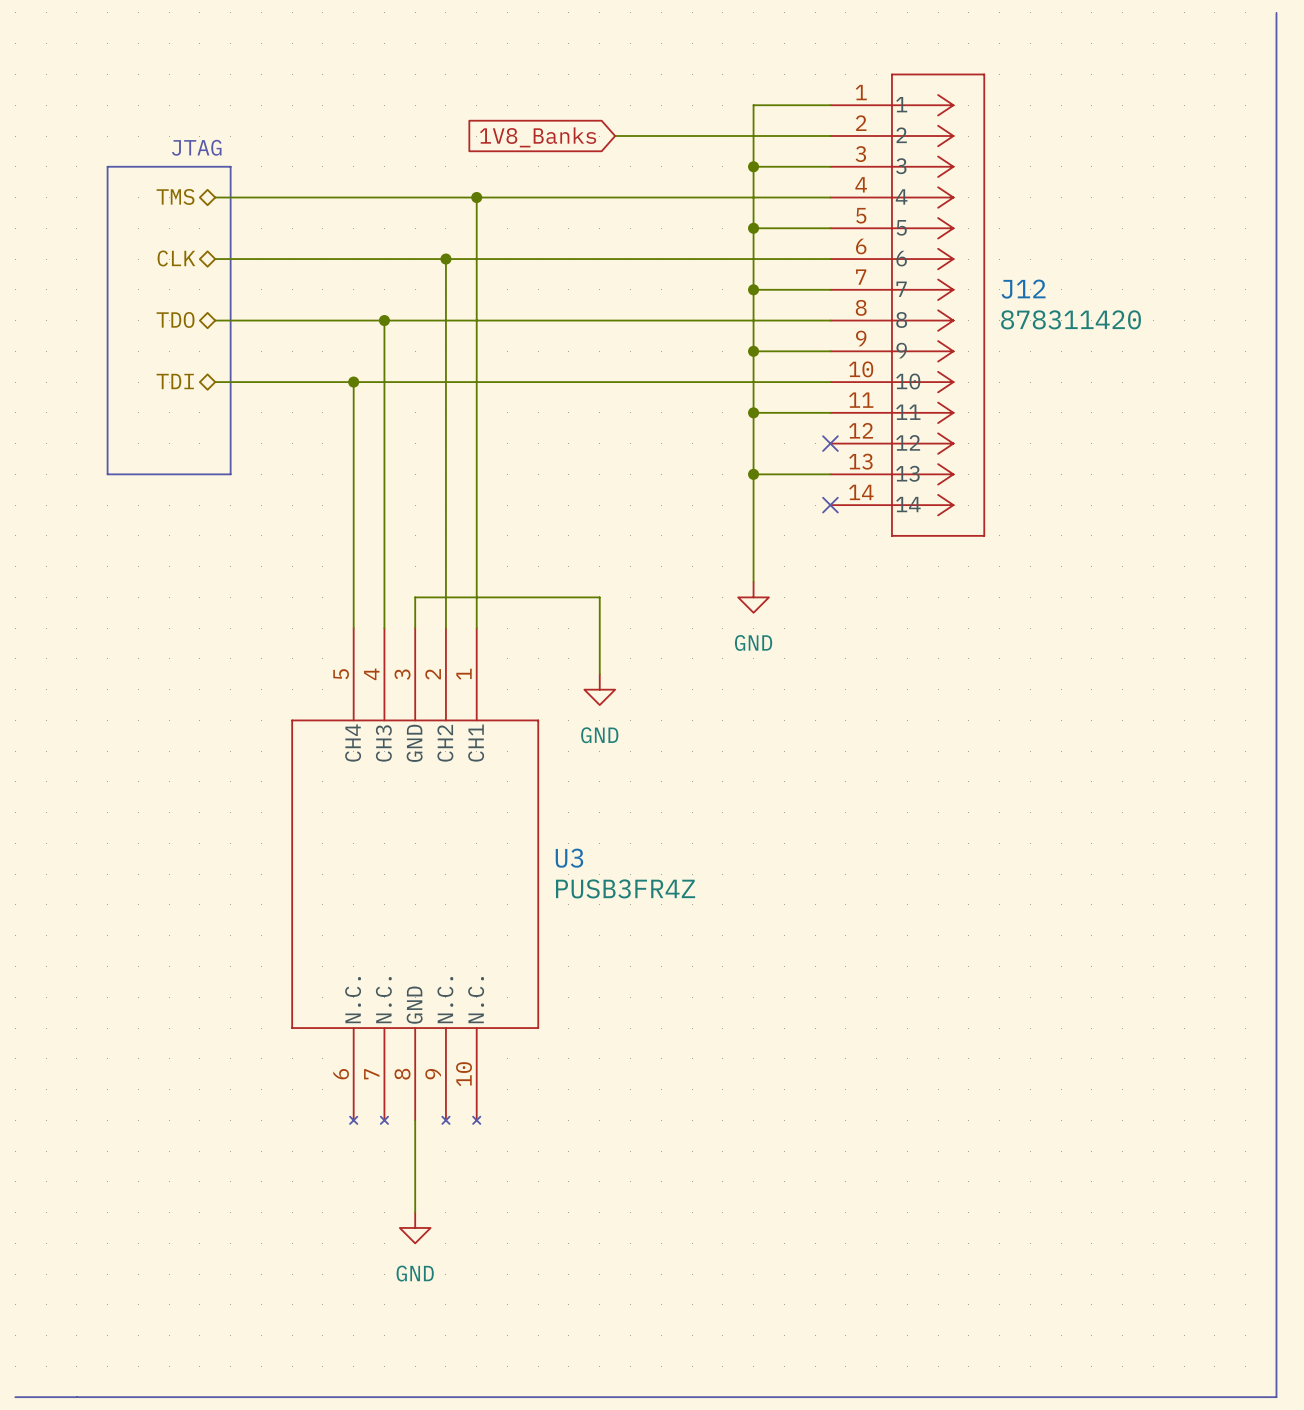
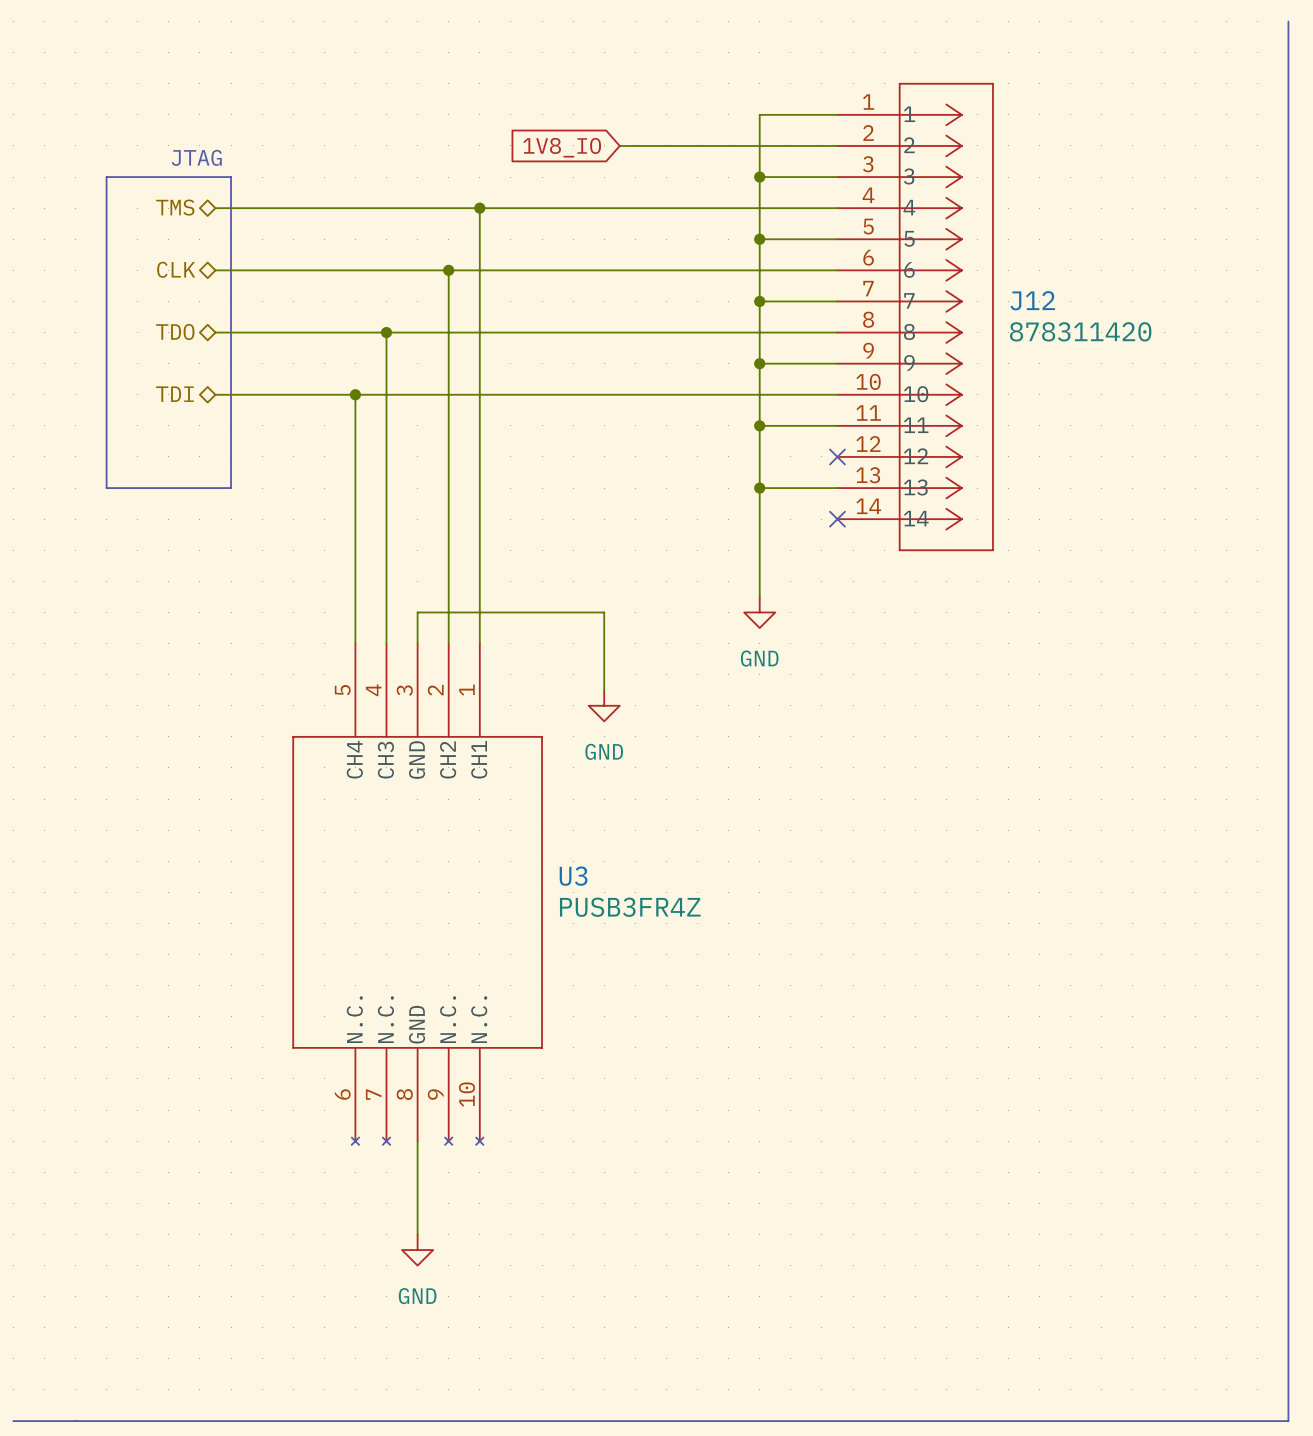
global label: 1V8_Banks (538, 137) -> 1V8_IO (562, 147)

